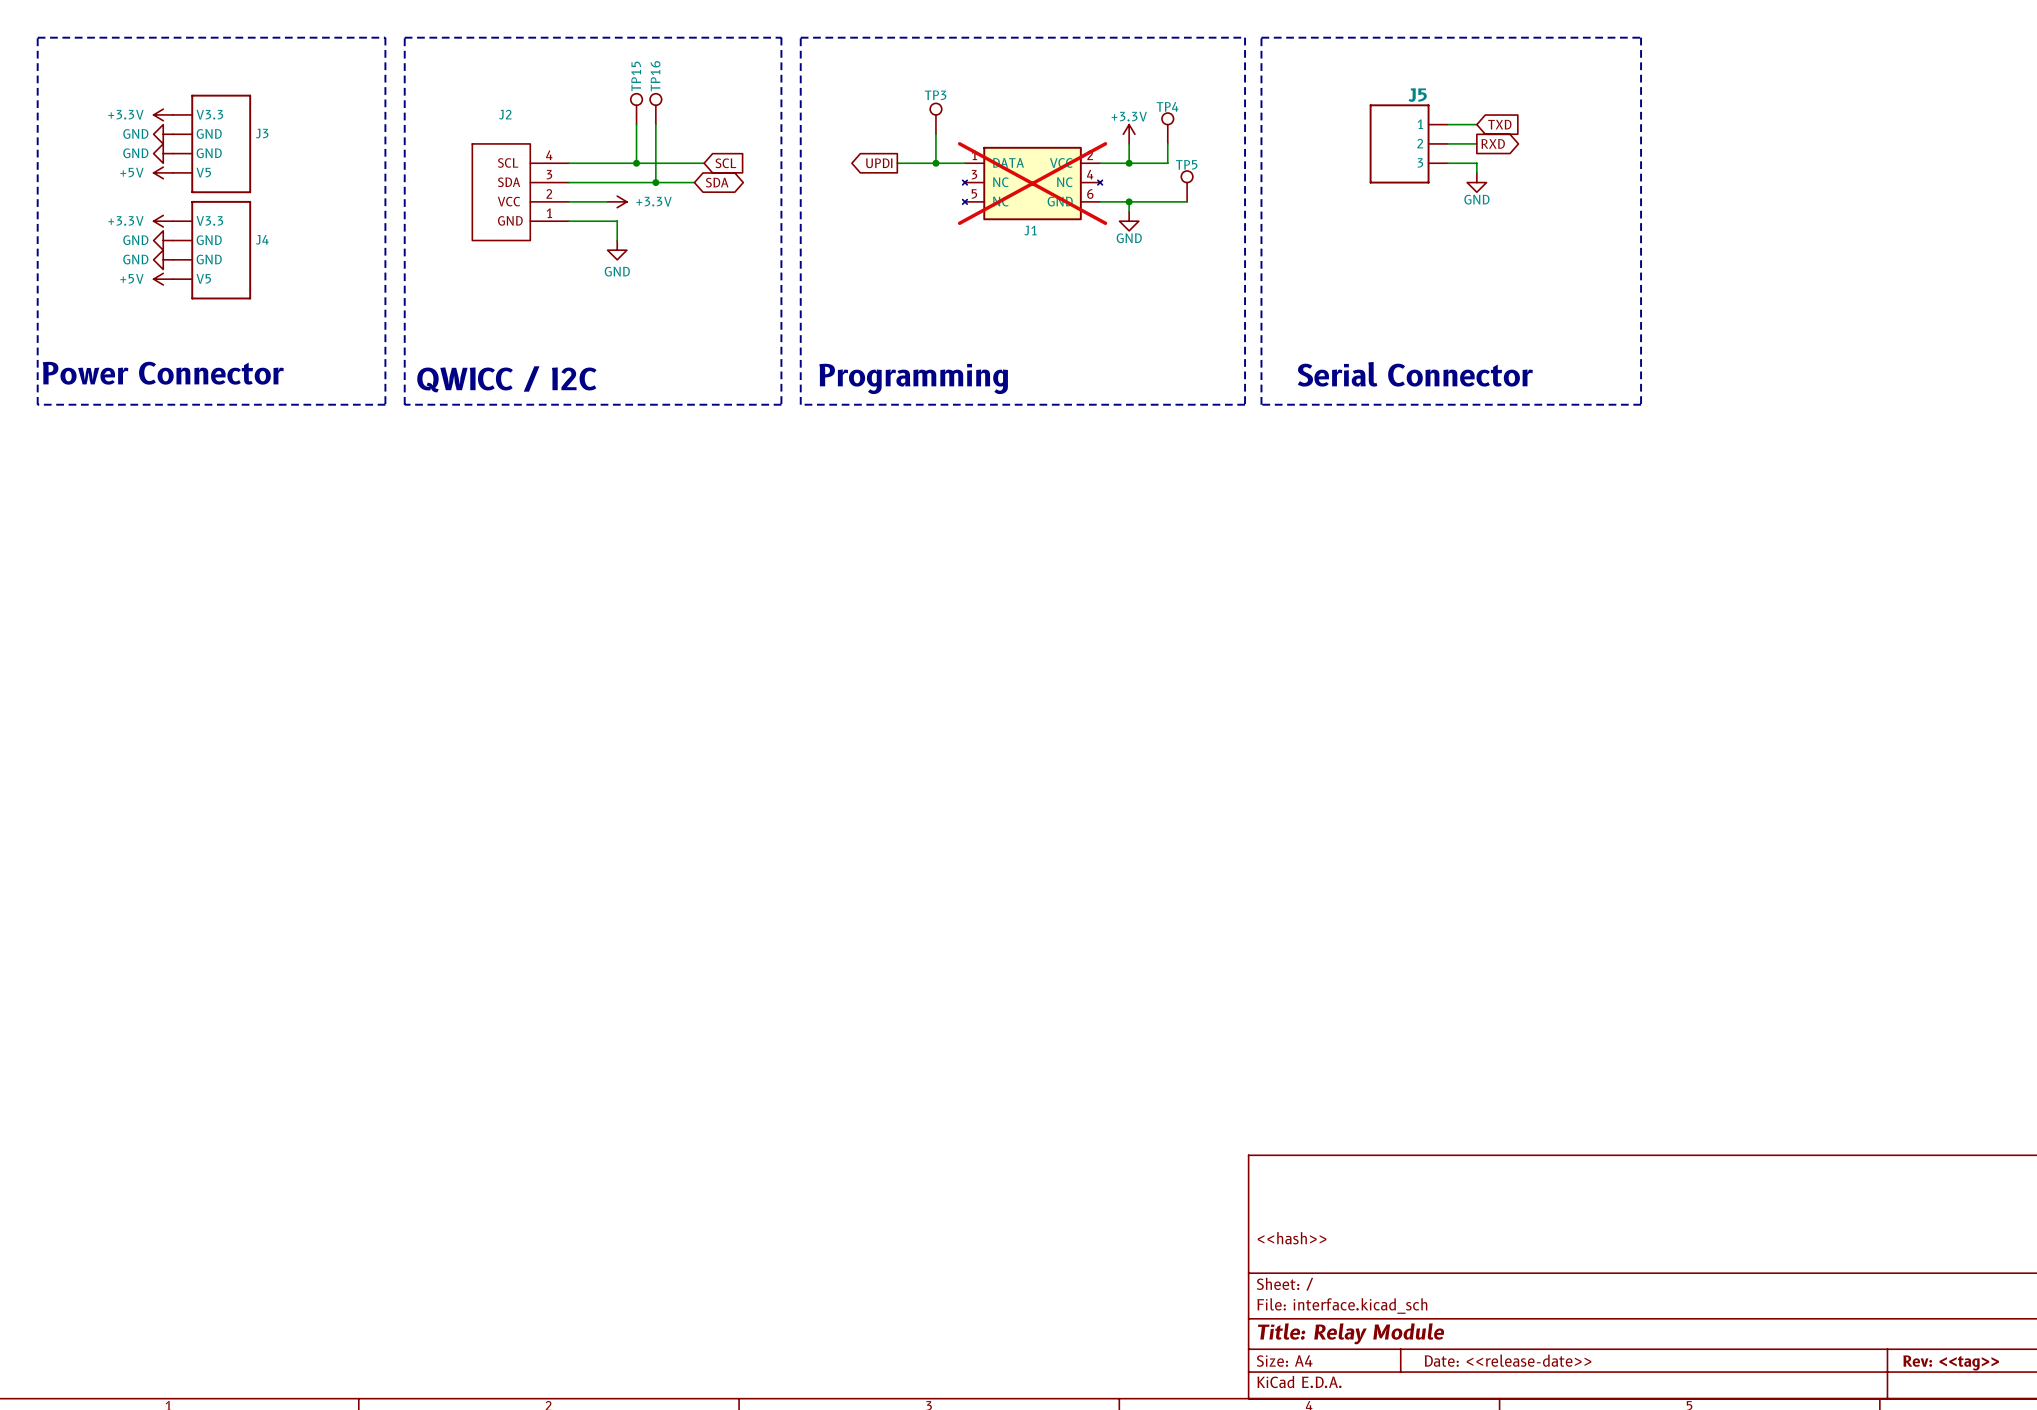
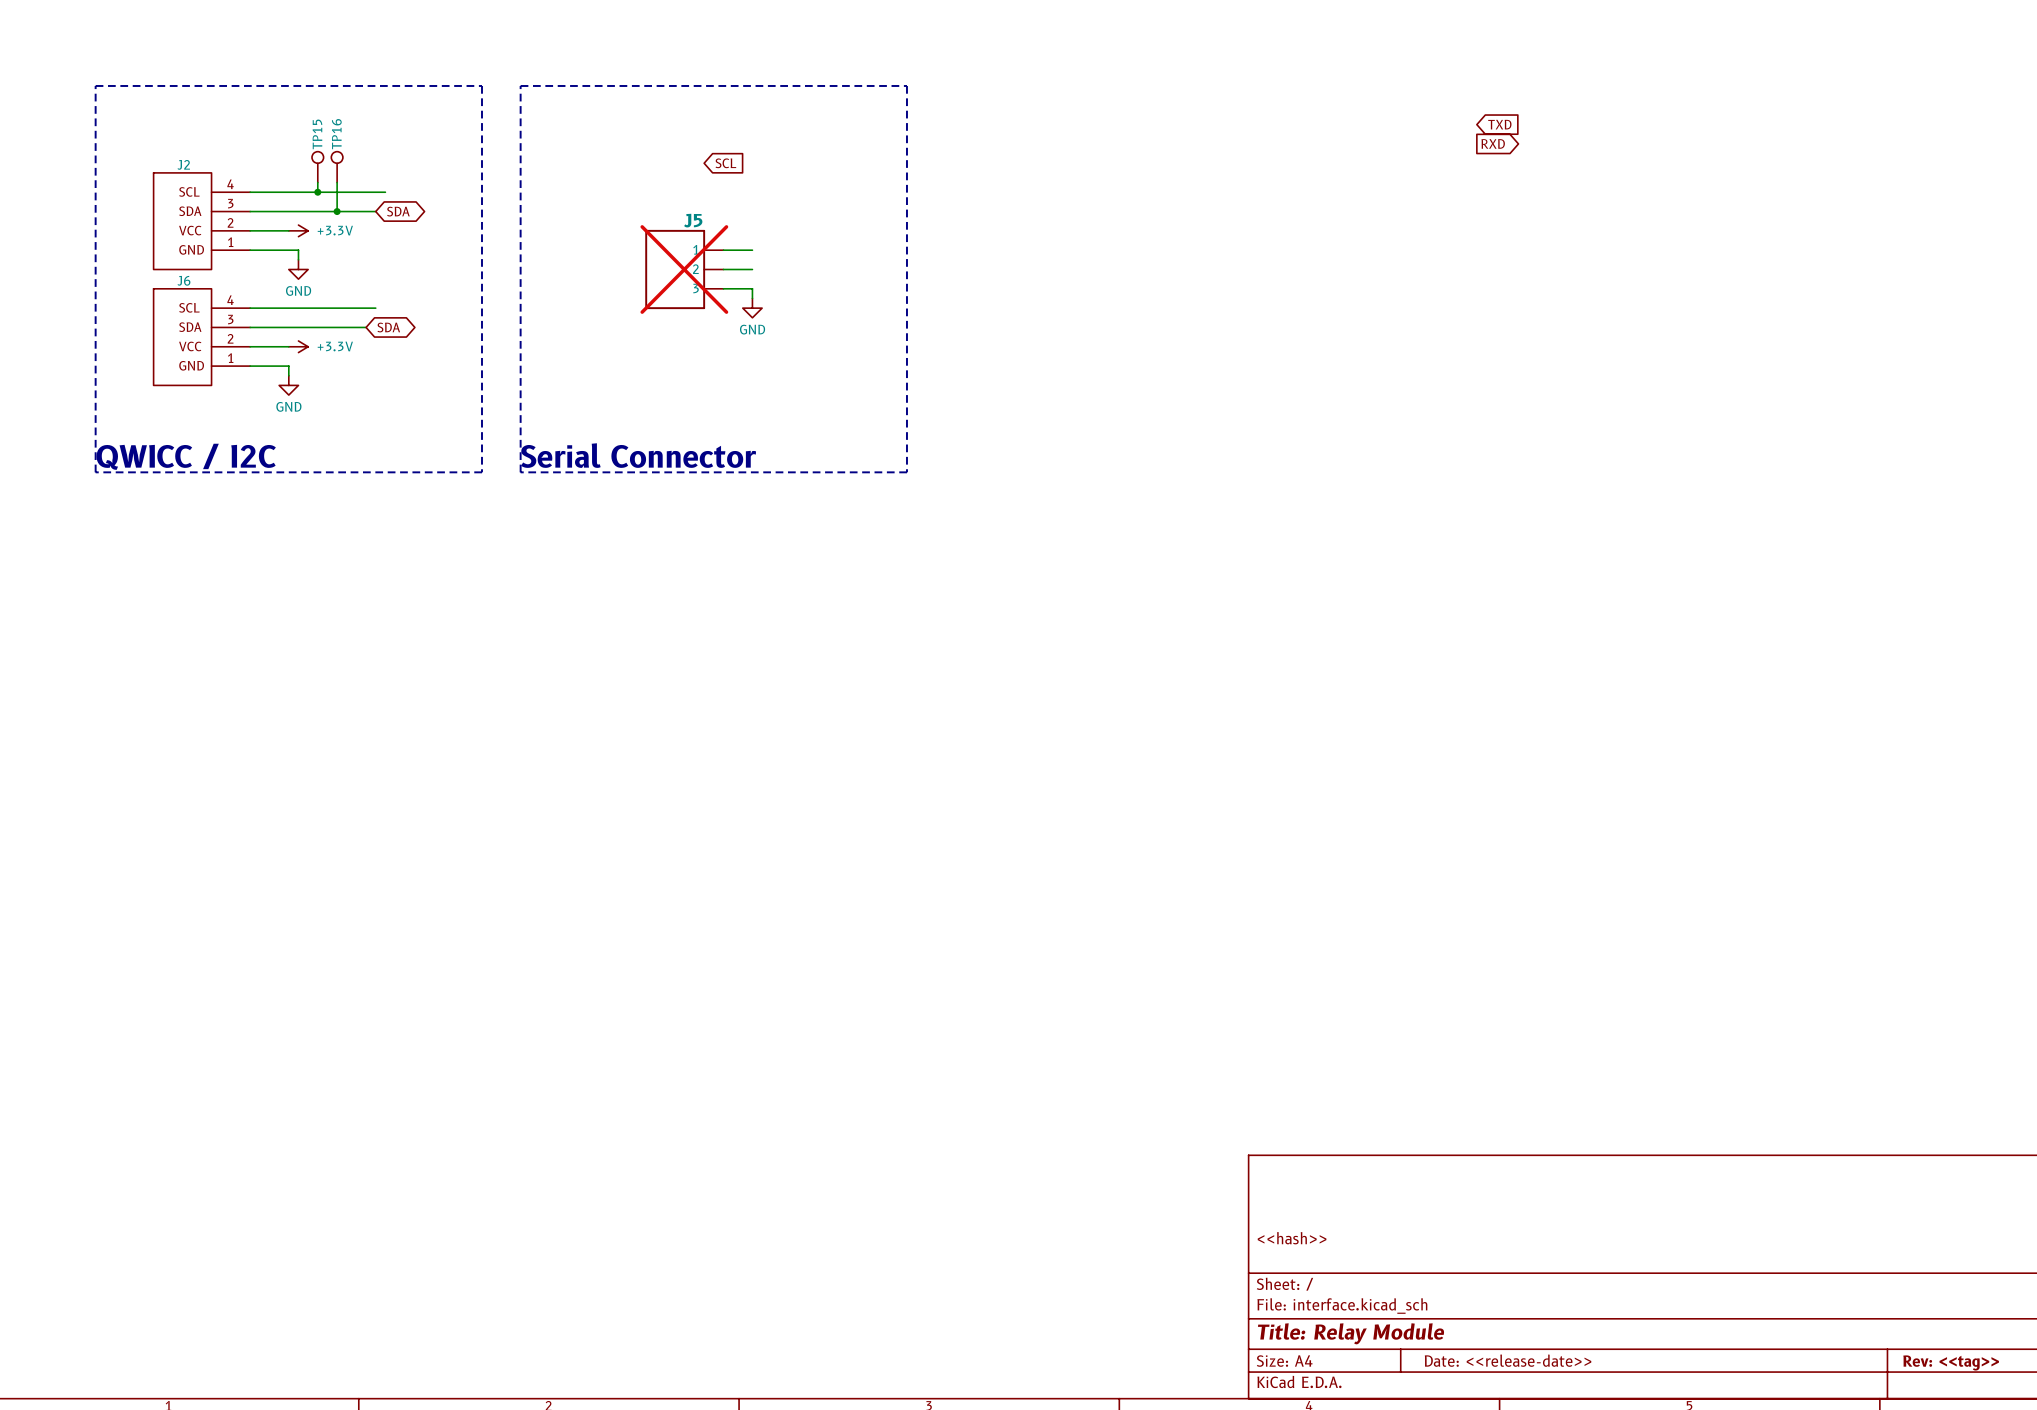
line: (37, 37) (385, 37) (385, 404) (37, 404) (37, 37) -> (95, 85) (95, 472) (481, 472) (481, 85) (95, 85)
line: (404, 37) (781, 37) (781, 404) (404, 404) (404, 37) -> none
line: (800, 37) (1245, 37) (1245, 404) (800, 404) (800, 37) -> none
line: (1261, 37) (1641, 37) (1641, 404) (1261, 404) (1261, 37) -> none
line: none -> (520, 85) (906, 85) (906, 472) (520, 472) (520, 85)
TP15 position: (636, 109) -> (317, 167)
TP16 position: (655, 109) -> (337, 167)
power symbol: +3.3V (163, 114) -> none
J2 name position: J2 (505, 114) -> J2 (183, 164)
TP3: (935, 118) -> none
wire: (636, 124) (636, 163) -> none
wire: (655, 124) (655, 182) -> none
wire: (1447, 124) (1476, 124) -> none
TP4: (1167, 128) -> none
power symbol: GND (163, 134) -> none
wire: (935, 134) (935, 163) -> none
power symbol: +3.3V (1129, 134) -> none
J3: (212, 143) -> none
wire: (1129, 143) (1129, 163) -> none
wire: (1167, 143) (1167, 163) (1100, 163) -> none
J5 position: (1408, 143) -> (684, 269)
wire: (1447, 143) (1476, 143) -> none
power symbol: GND (163, 153) -> none
wire: (568, 163) (704, 163) -> none
junction: (636, 163) -> none
global label: UPDI (879, 163) -> none
wire: (897, 163) (964, 163) -> none
junction: (935, 163) -> none
junction: (1129, 163) -> none
wire: (1447, 163) (1476, 163) (1476, 172) -> none
power symbol: +5V (163, 172) -> none
wire: none -> (317, 182) (317, 192)
wire: none -> (337, 182) (337, 211)
wire: (568, 182) (694, 182) -> none
junction: (655, 182) -> none
global label: SDA (717, 182) -> none
power symbol: GND (1476, 182) -> none
J1: (1032, 183) -> none
TP5: (1187, 186) -> none
wire: none -> (250, 192) (385, 192)
junction: none -> (317, 192)
J2 position: (520, 192) -> (201, 221)
wire: (568, 201) (607, 201) -> none
power symbol: +3.3V (617, 201) -> none
wire: (1100, 201) (1187, 201) -> none
wire: (1129, 201) (1129, 211) -> none
junction: (1129, 201) -> none
wire: none -> (250, 211) (375, 211)
junction: none -> (337, 211)
global label: none -> SDA (398, 211)
power symbol: +3.3V (163, 221) -> none
wire: (568, 221) (617, 221) (617, 240) -> none
power symbol: GND (1129, 221) -> none
wire: none -> (250, 230) (288, 230)
power symbol: none -> +3.3V (298, 230)
power symbol: GND (163, 240) -> none
J4: (212, 250) -> none
wire: none -> (250, 250) (298, 250) (298, 259)
power symbol position: GND (617, 250) -> GND (752, 308)
wire: none -> (723, 250) (752, 250)
power symbol: GND (163, 259) -> none
power symbol: none -> GND (298, 269)
J5 do-not-place cross: none -> (684, 269)
wire: none -> (723, 269) (752, 269)
power symbol: +5V (163, 279) -> none
wire: none -> (723, 288) (752, 288) (752, 298)
wire: none -> (250, 308) (375, 308)
wire: none -> (250, 327) (366, 327)
global label: none -> SDA (388, 327)
J6: none -> (201, 337)
wire: none -> (250, 346) (288, 346)
power symbol: none -> +3.3V (298, 346)
wire: none -> (250, 366) (288, 366) (288, 375)
text: Power Connector (163, 373) -> none
text: Serial Connector (1415, 374) -> none
text: Programming (913, 378) -> none
text: QWICC / I2C (506, 379) -> none
power symbol: none -> GND (288, 385)
text: none -> Serial Connector (638, 455)
text: none -> QWICC / I2C (186, 456)

